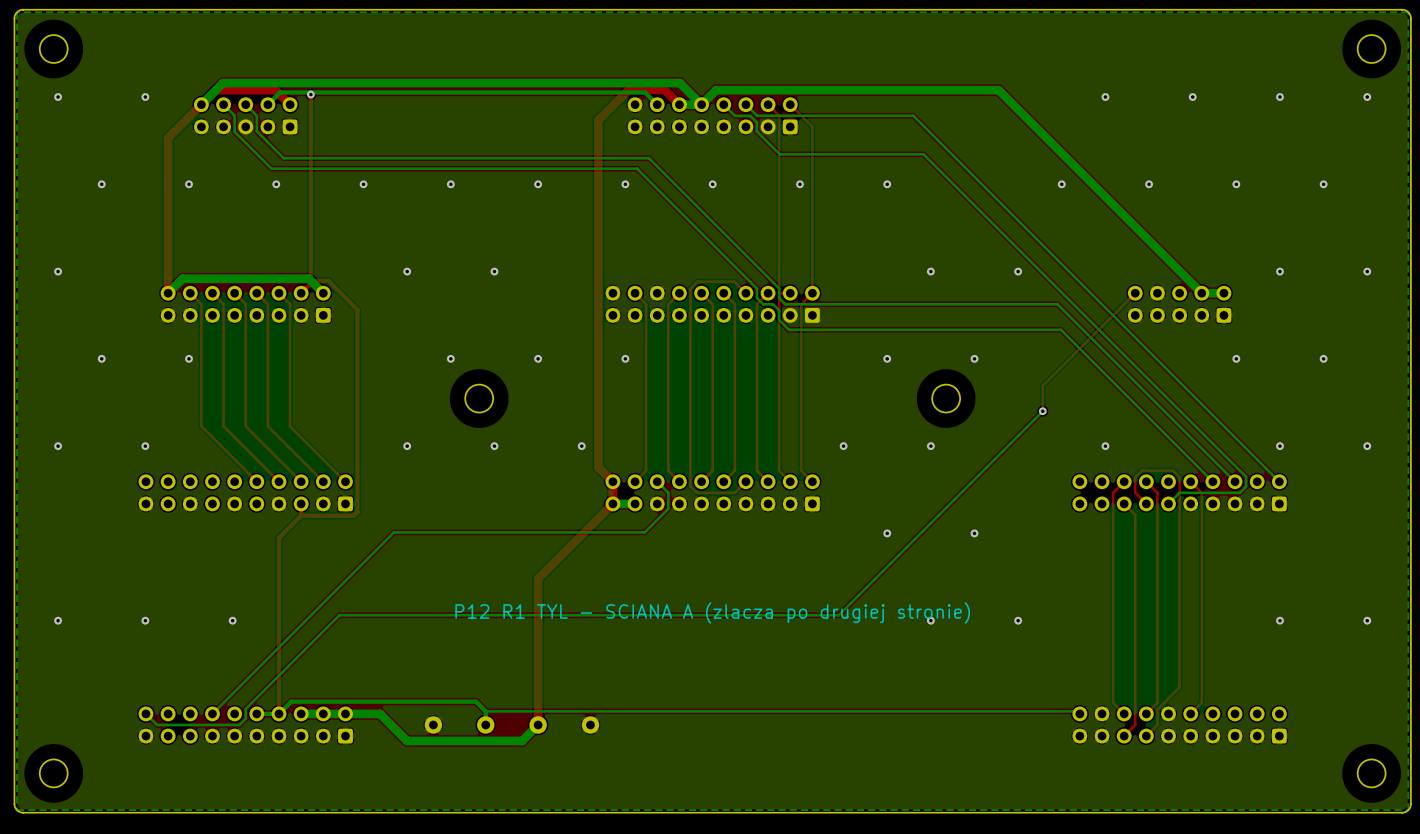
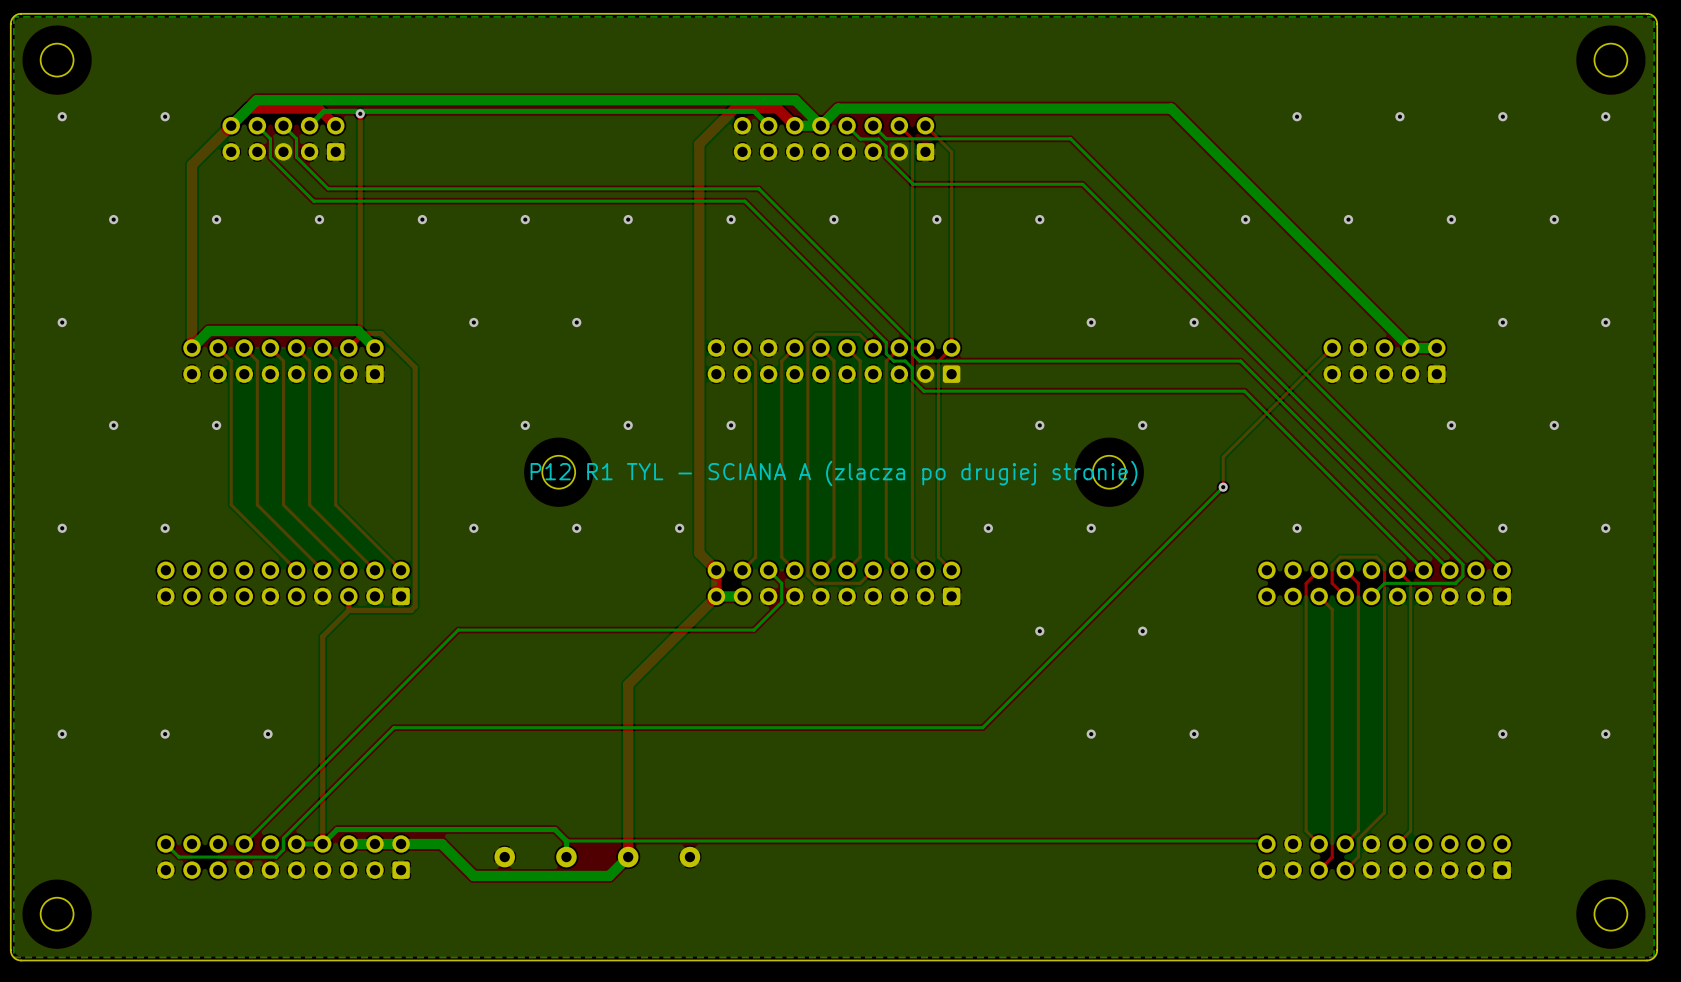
text position: P12 R1 TYL - SCIANA A (zlacza po drugiej stronie) (712, 613) -> P12 R1 TYL - SCIANA A (zlacza po drugiej stronie) (834, 473)

